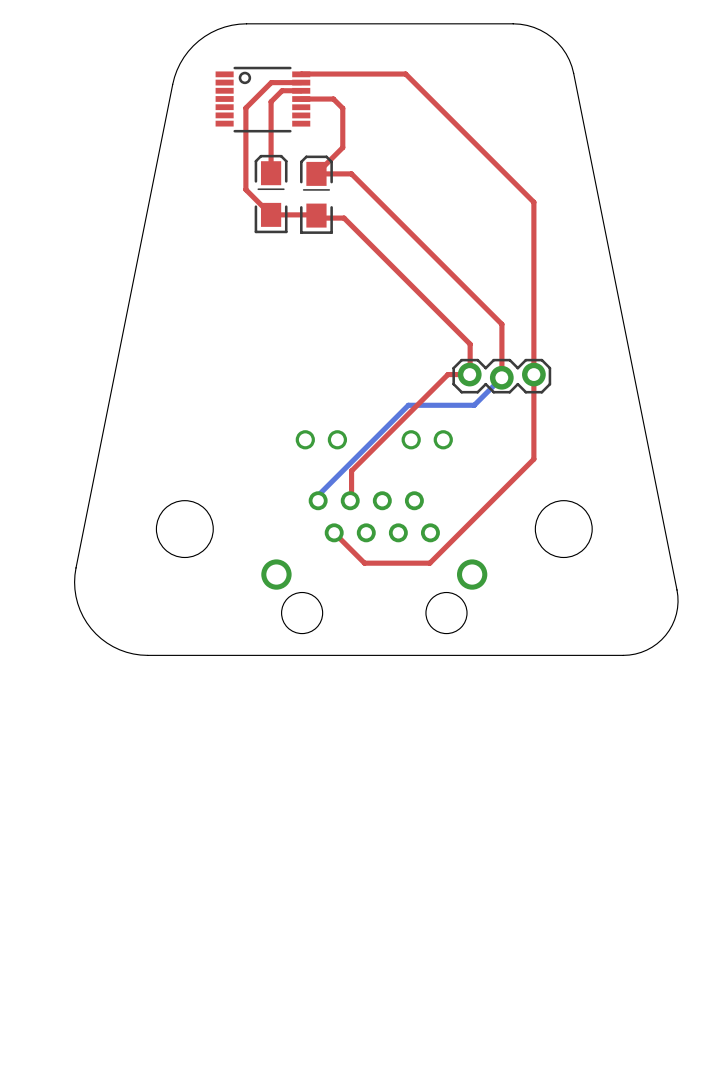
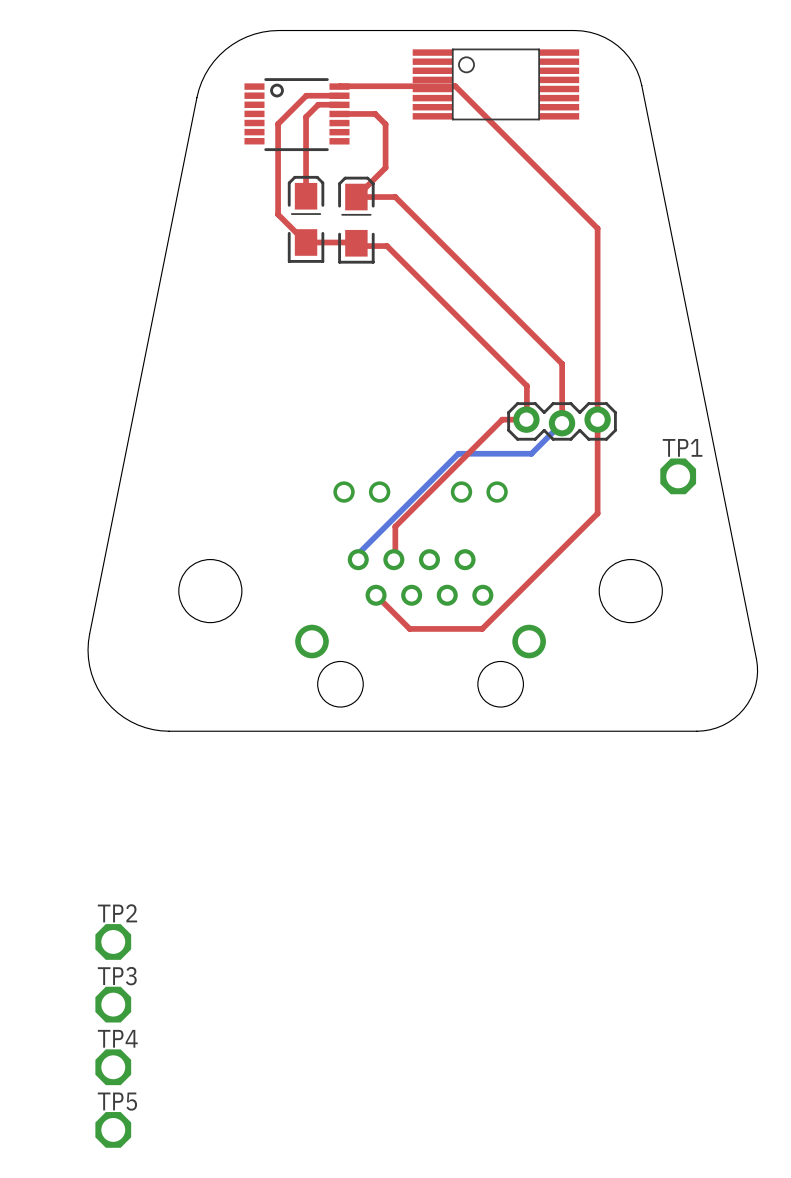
part: none -> (495, 84)
TP1: none -> (678, 476)
TP2: none -> (113, 941)
TP3: none -> (113, 1004)
TP4: none -> (113, 1067)
TP5: none -> (113, 1129)

